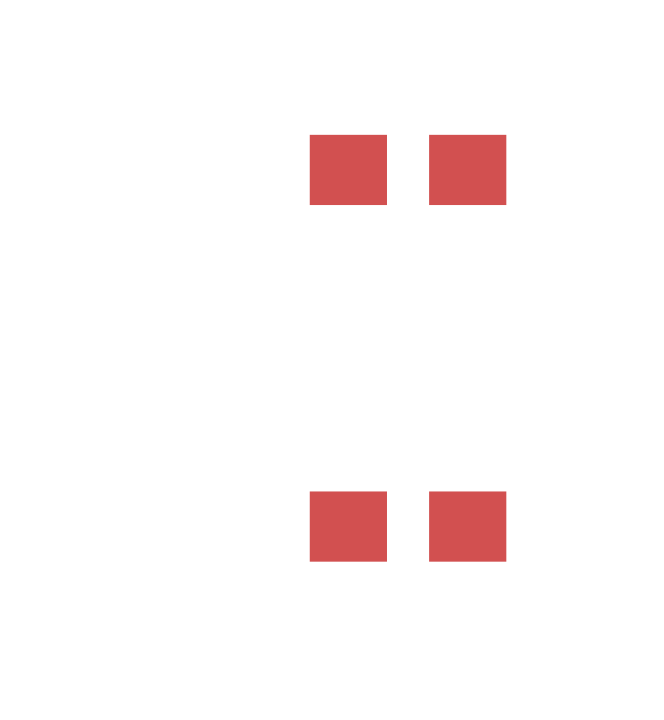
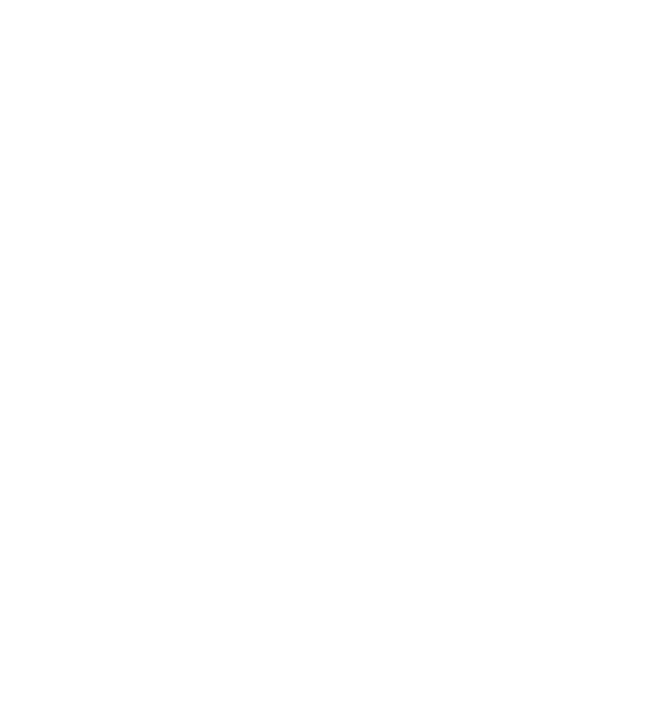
part: (408, 169) -> none
part: (408, 526) -> none

